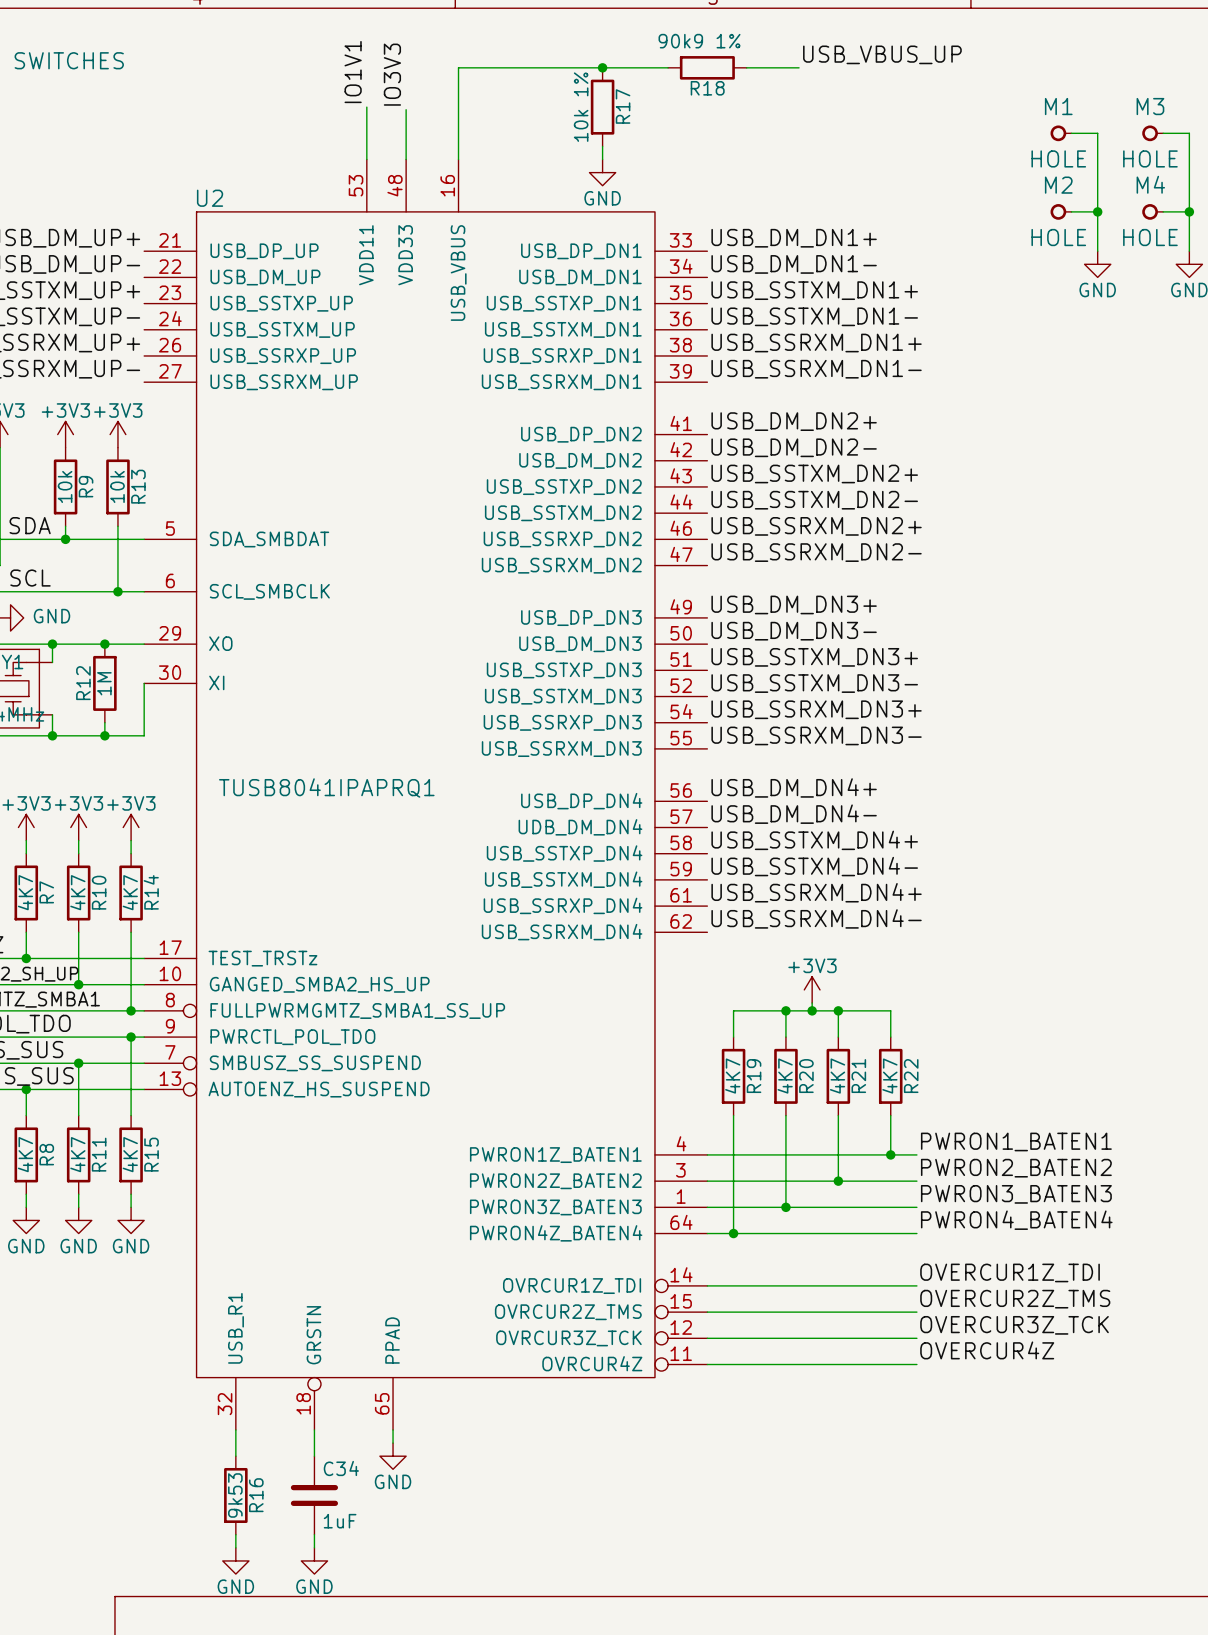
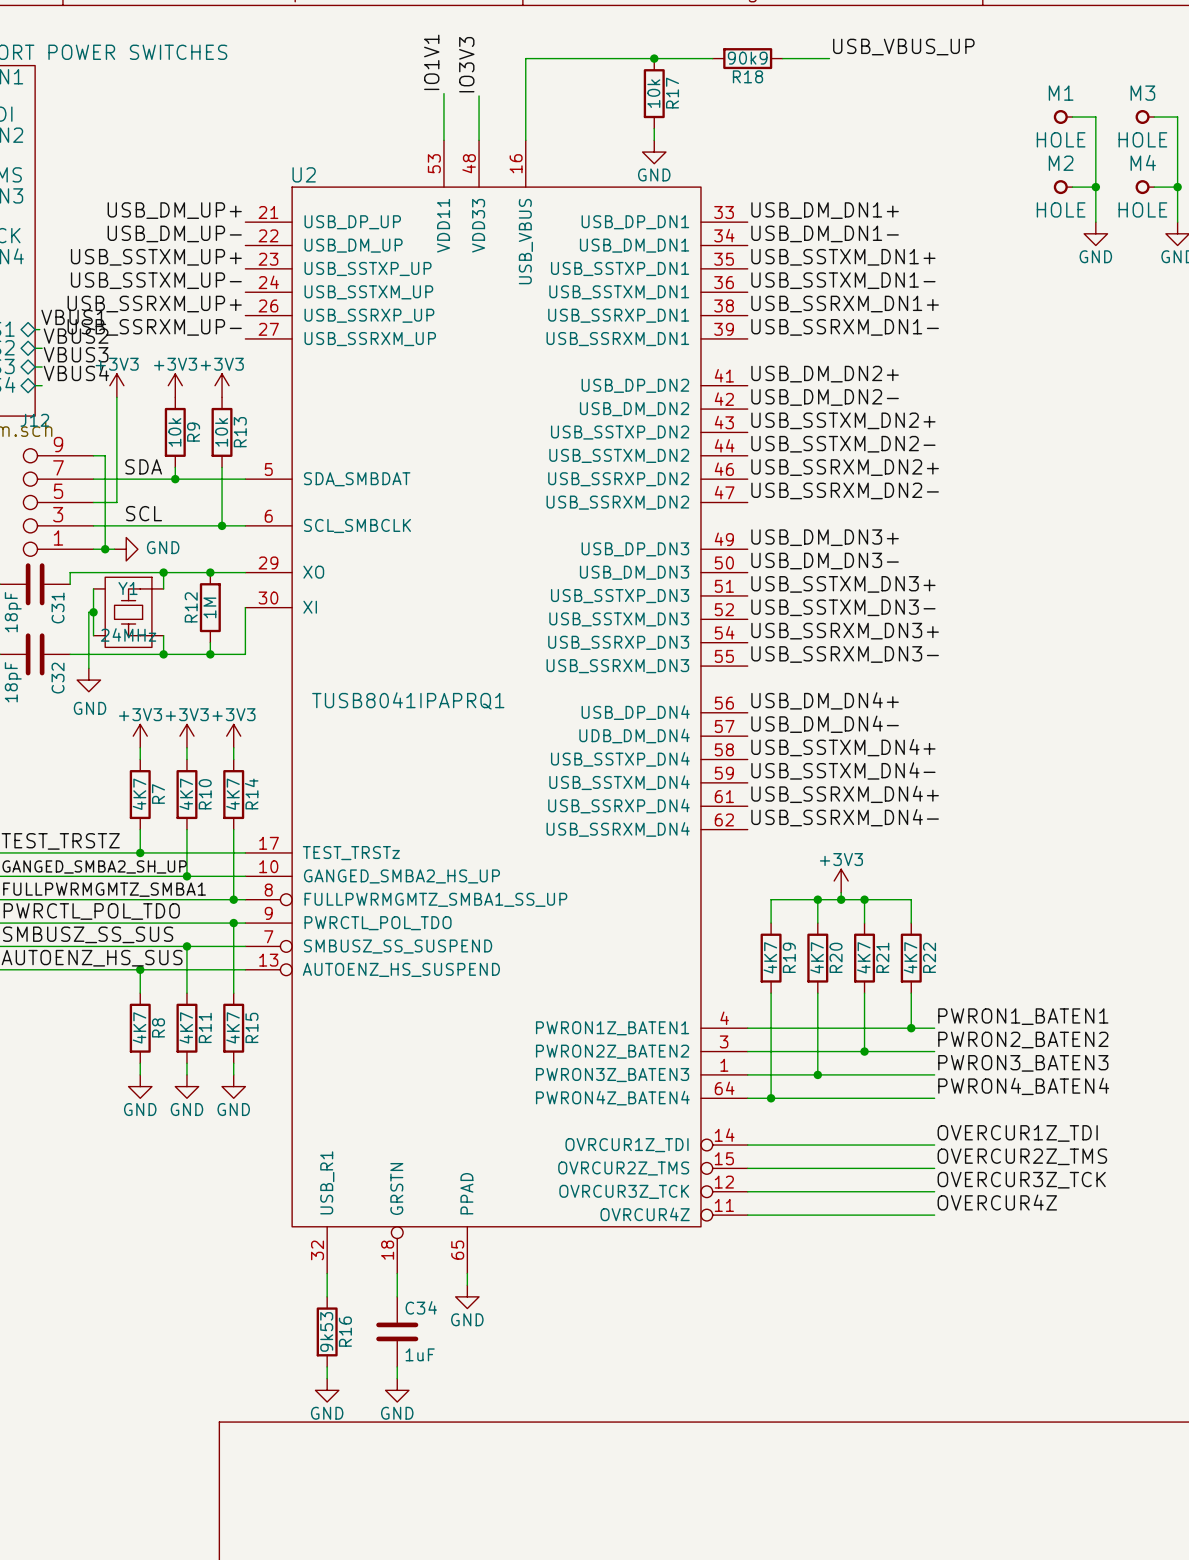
R18 value: 90k9 1% (699, 41) -> 90k9 (747, 58)
R17 value: 10k 1% (581, 107) -> 10k (653, 93)

